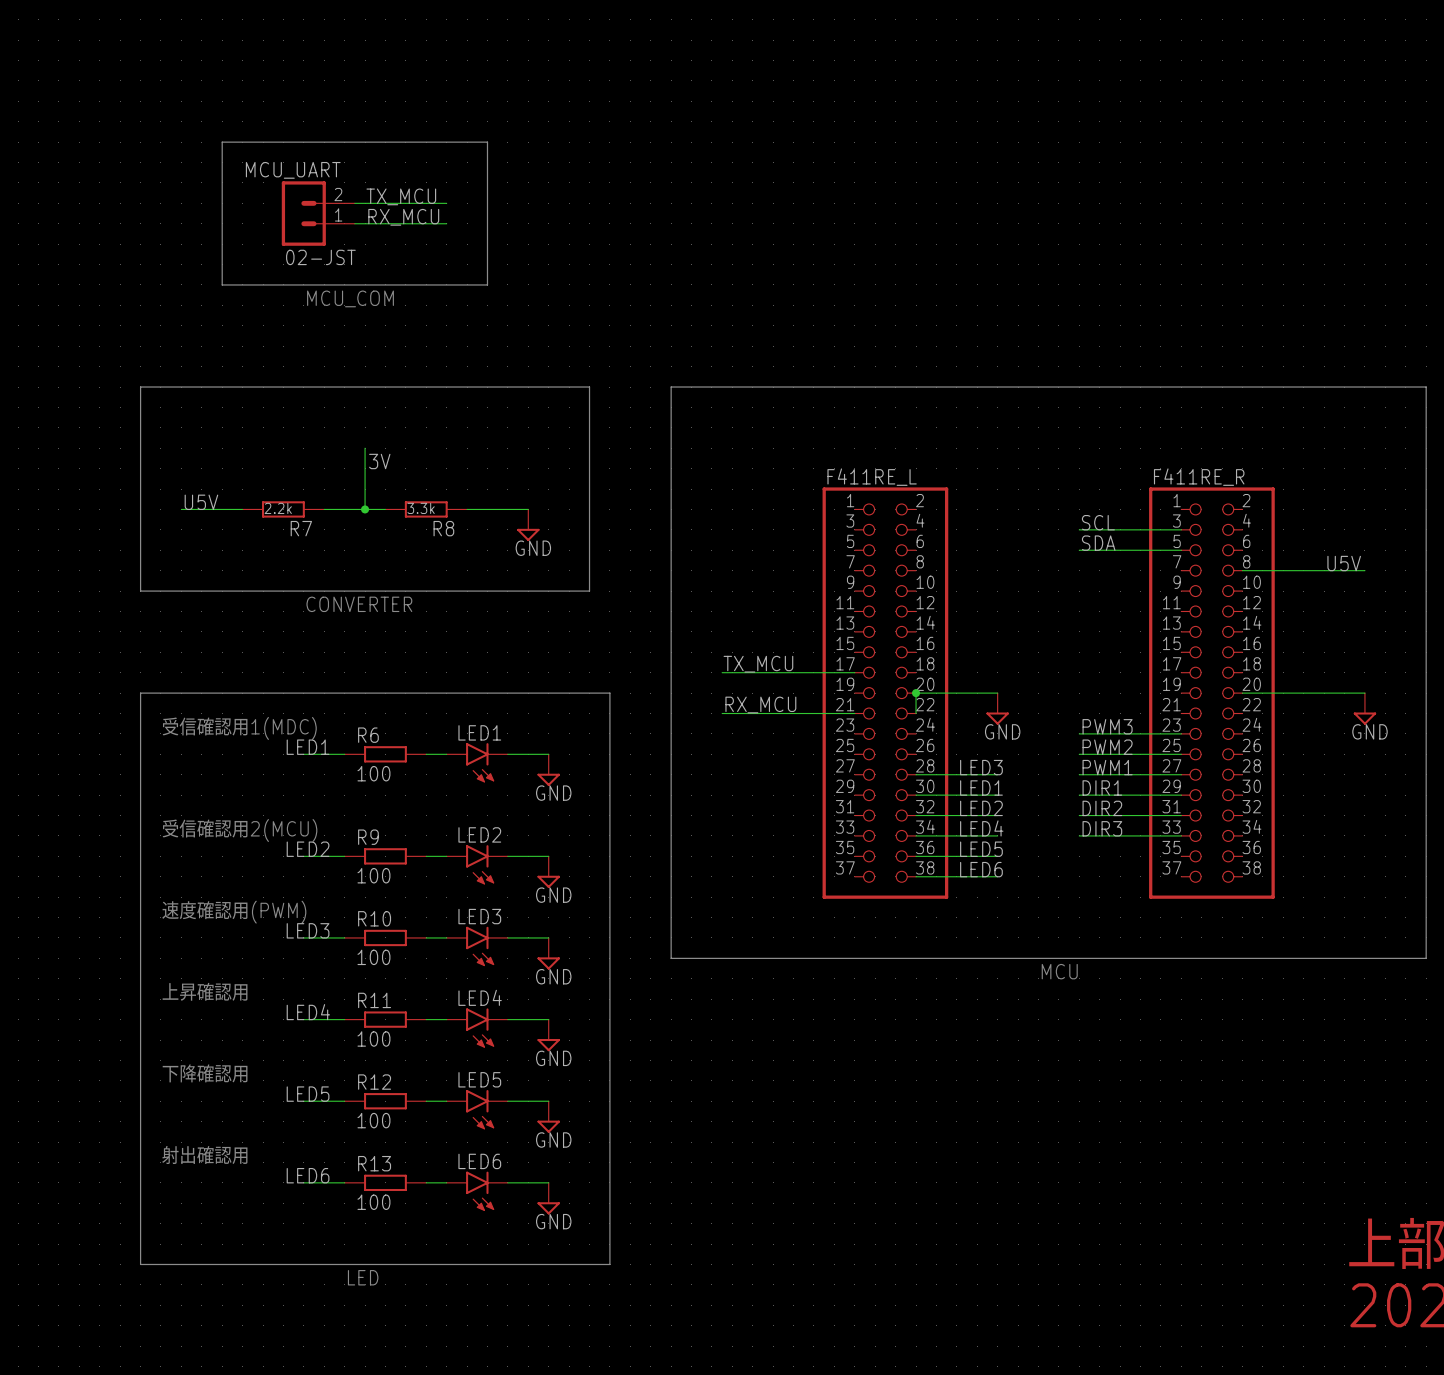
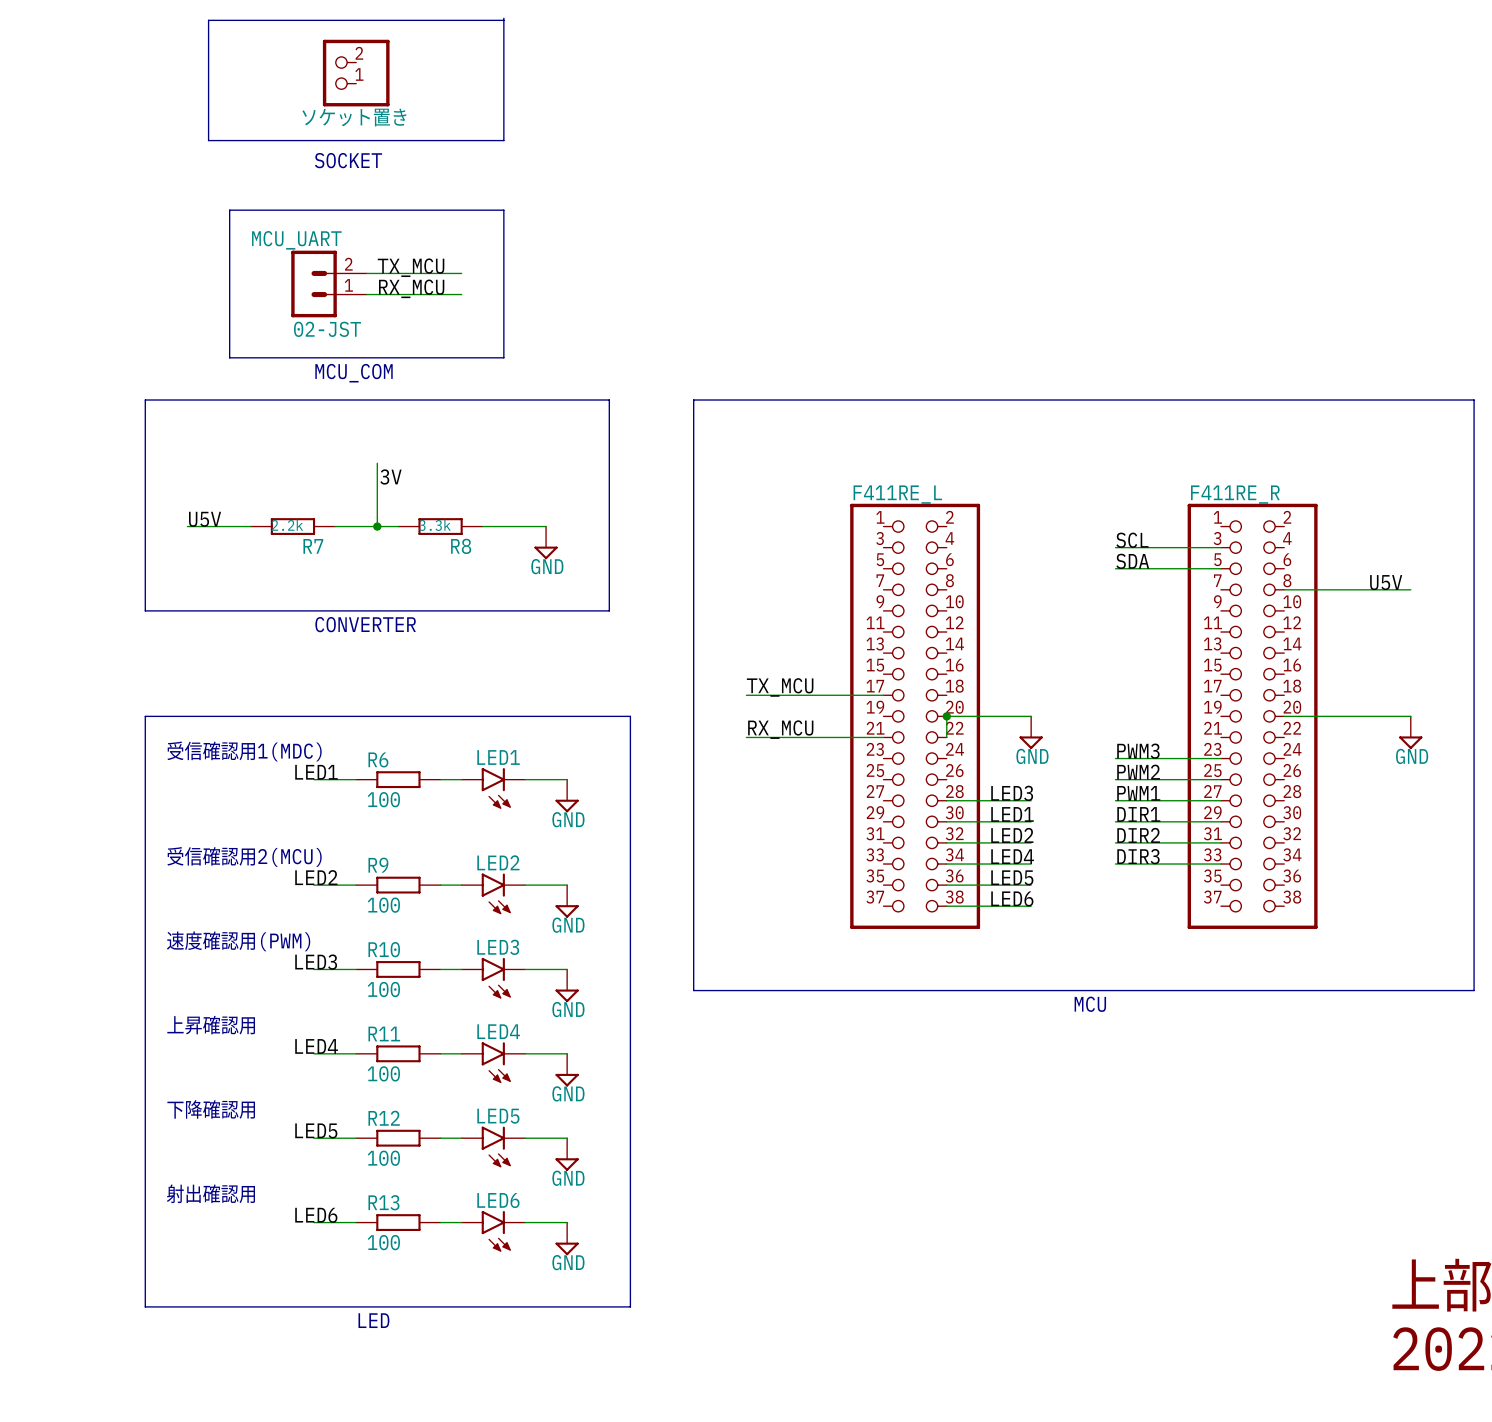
line: none -> (503, 18) (503, 140) (208, 140) (208, 20) (503, 20)
ソケット置き: none -> (356, 73)
text: none -> SOCKET (348, 160)
label position: TX_MCU (401, 196) -> TX_MCU (411, 267)
line: (222, 203) (222, 142) (487, 142) (487, 203) -> (229, 210) (503, 210)
MCU_UART position: (318, 213) -> (329, 284)
label position: RX_MCU (403, 217) -> RX_MCU (411, 288)
wire: (354, 223) (446, 223) -> (366, 273) (461, 273)
line: (222, 284) (487, 284) -> (229, 294) (229, 357) (503, 357) (503, 294)
text position: MCU_COM (350, 298) -> MCU_COM (354, 373)

